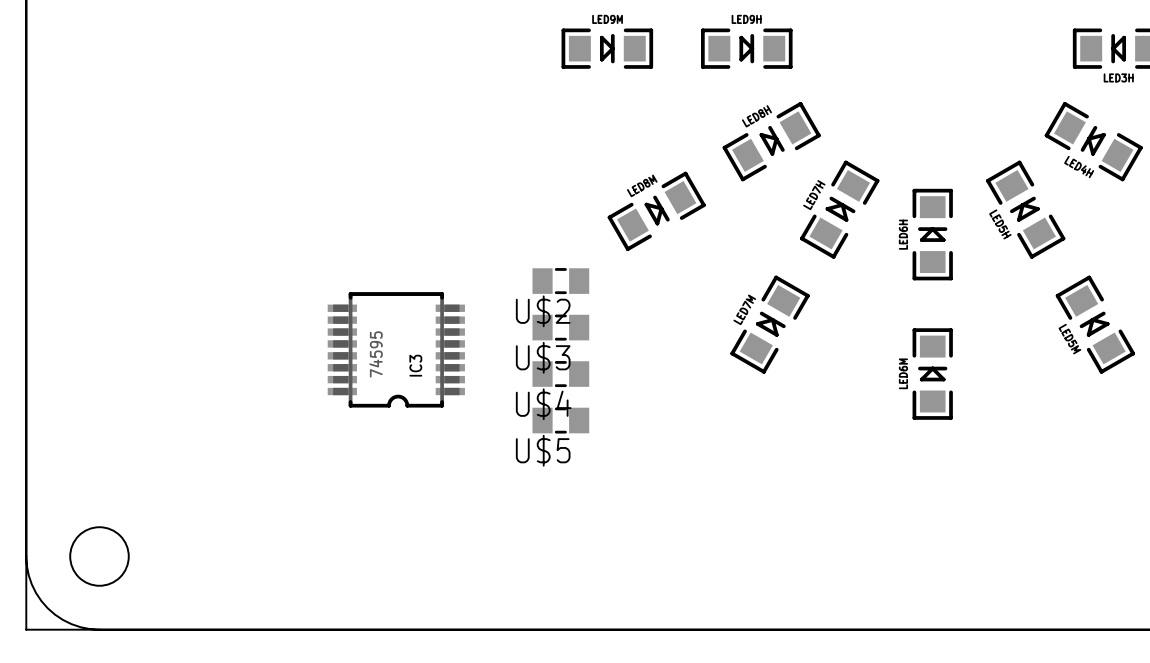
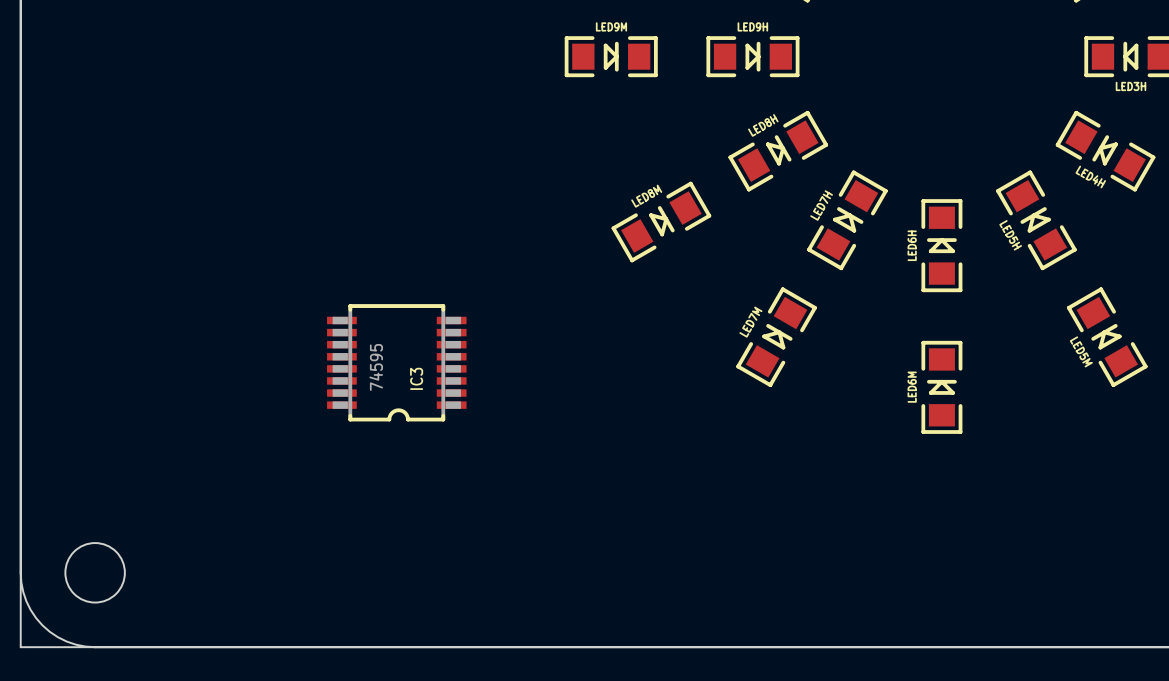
U$2: (560, 281) -> none
U$3: (560, 327) -> none
U$4: (560, 374) -> none
U$5: (560, 420) -> none

